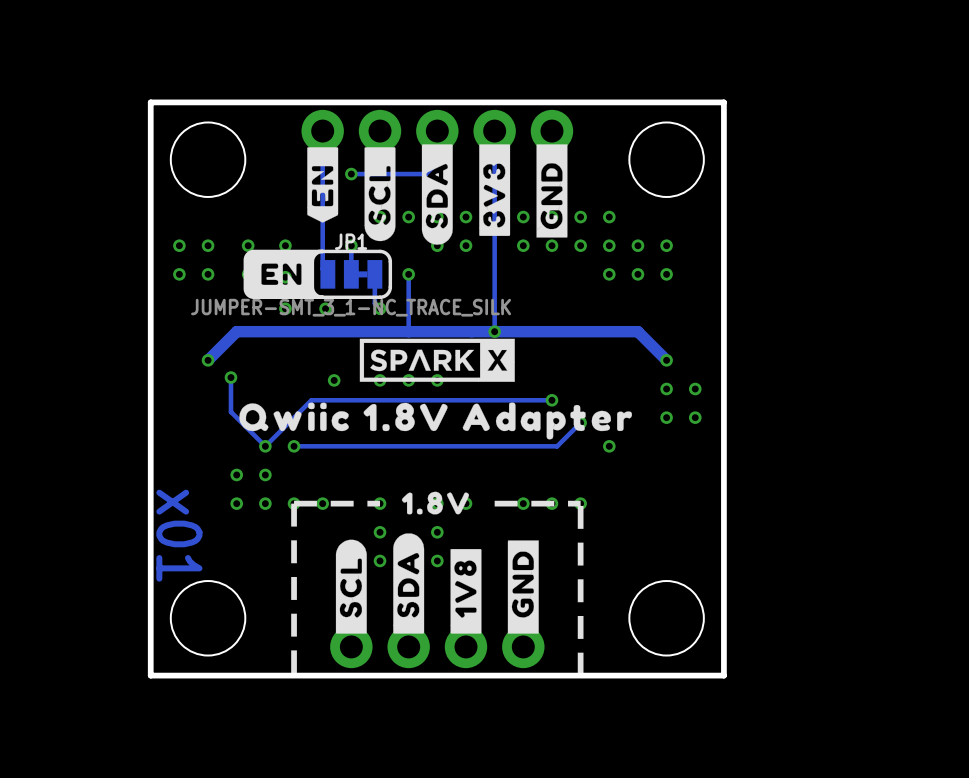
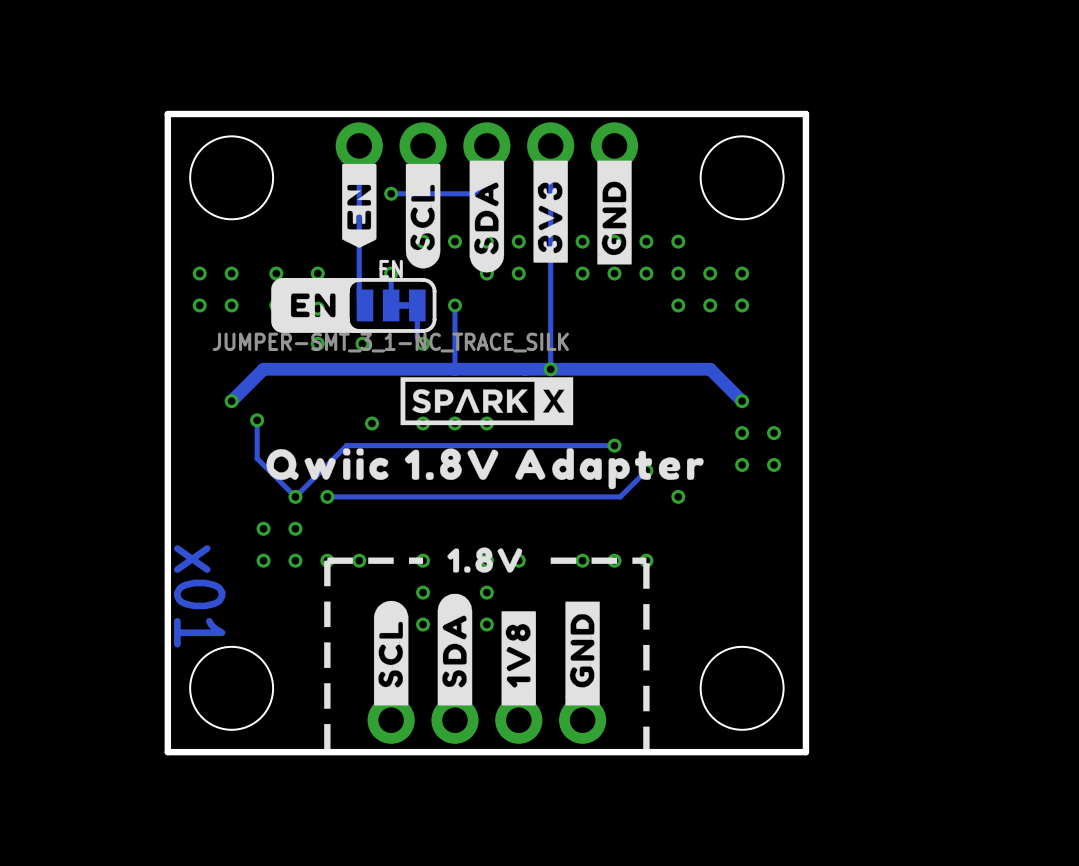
JP1 name: JP1 (351, 241) -> EN (391, 269)

